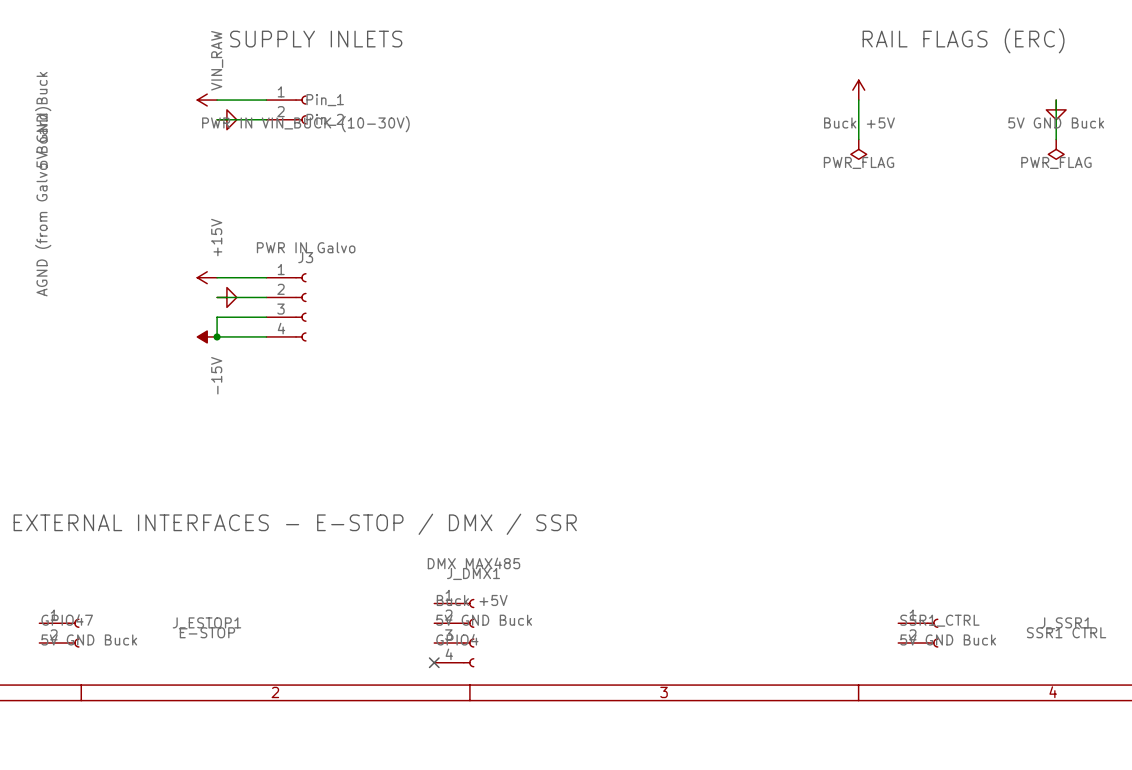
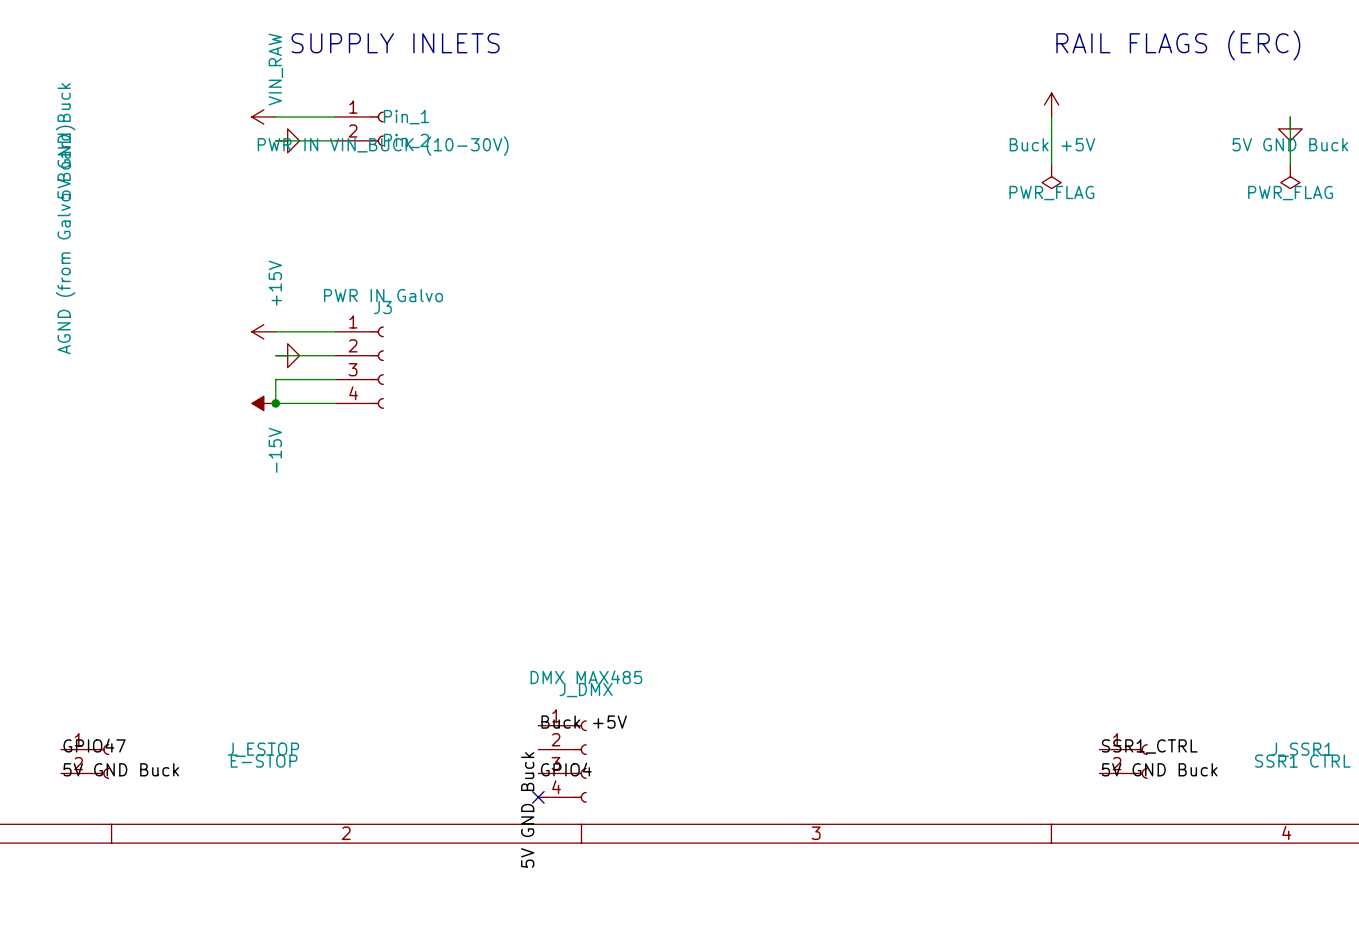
text: EXTERNAL INTERFACES - E-STOP / DMX / SSR (295, 524) -> none
J_DMX1 name: J_DMX1 (473, 574) -> J_DMX (586, 690)
label rotation: 0° (484, 620) -> 90° counterclockwise (527, 809)
J_ESTOP1 name: J_ESTOP1 (206, 623) -> J_ESTOP (263, 749)

